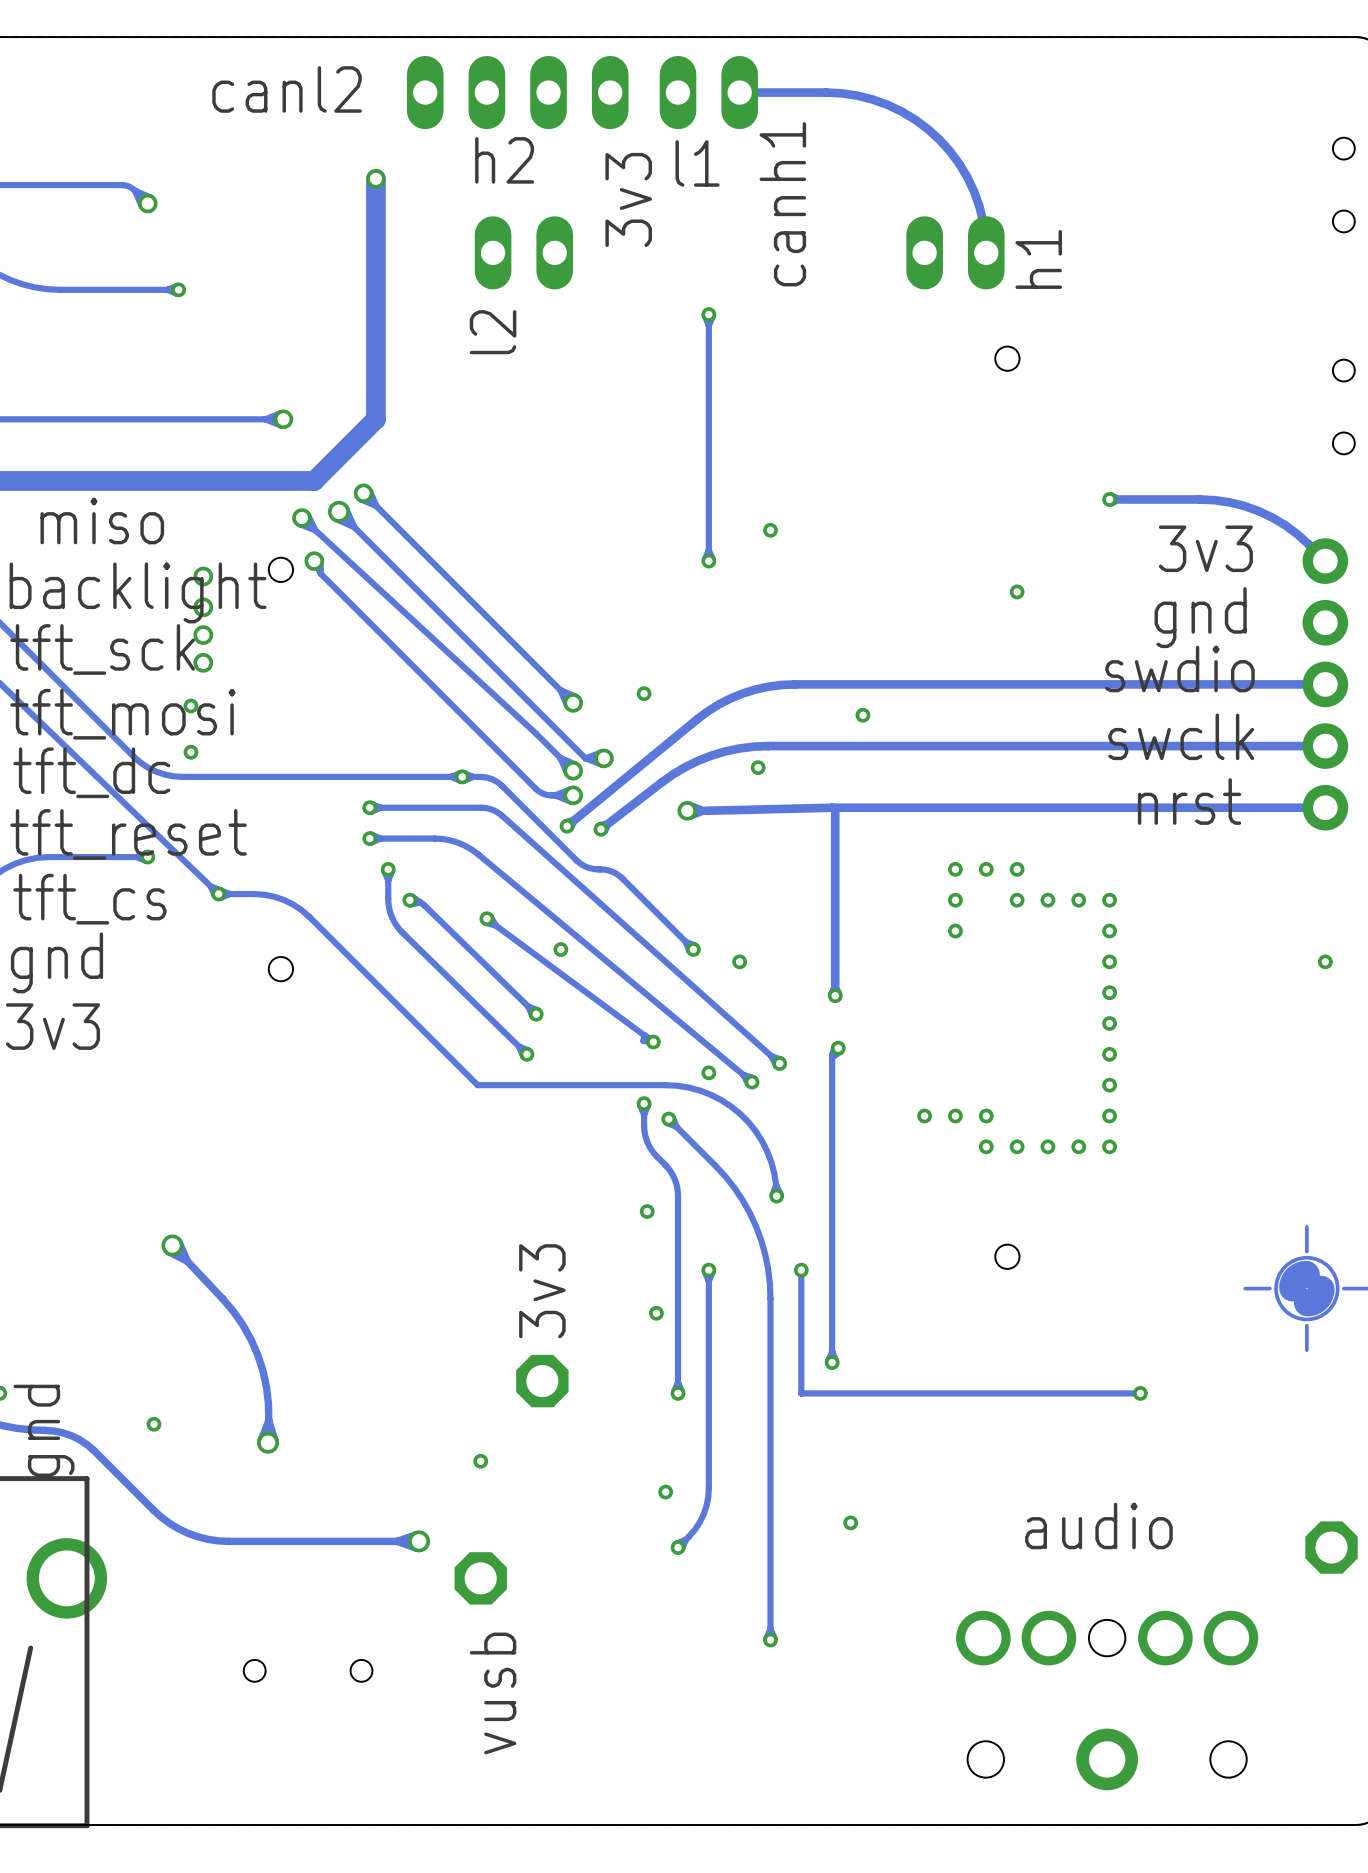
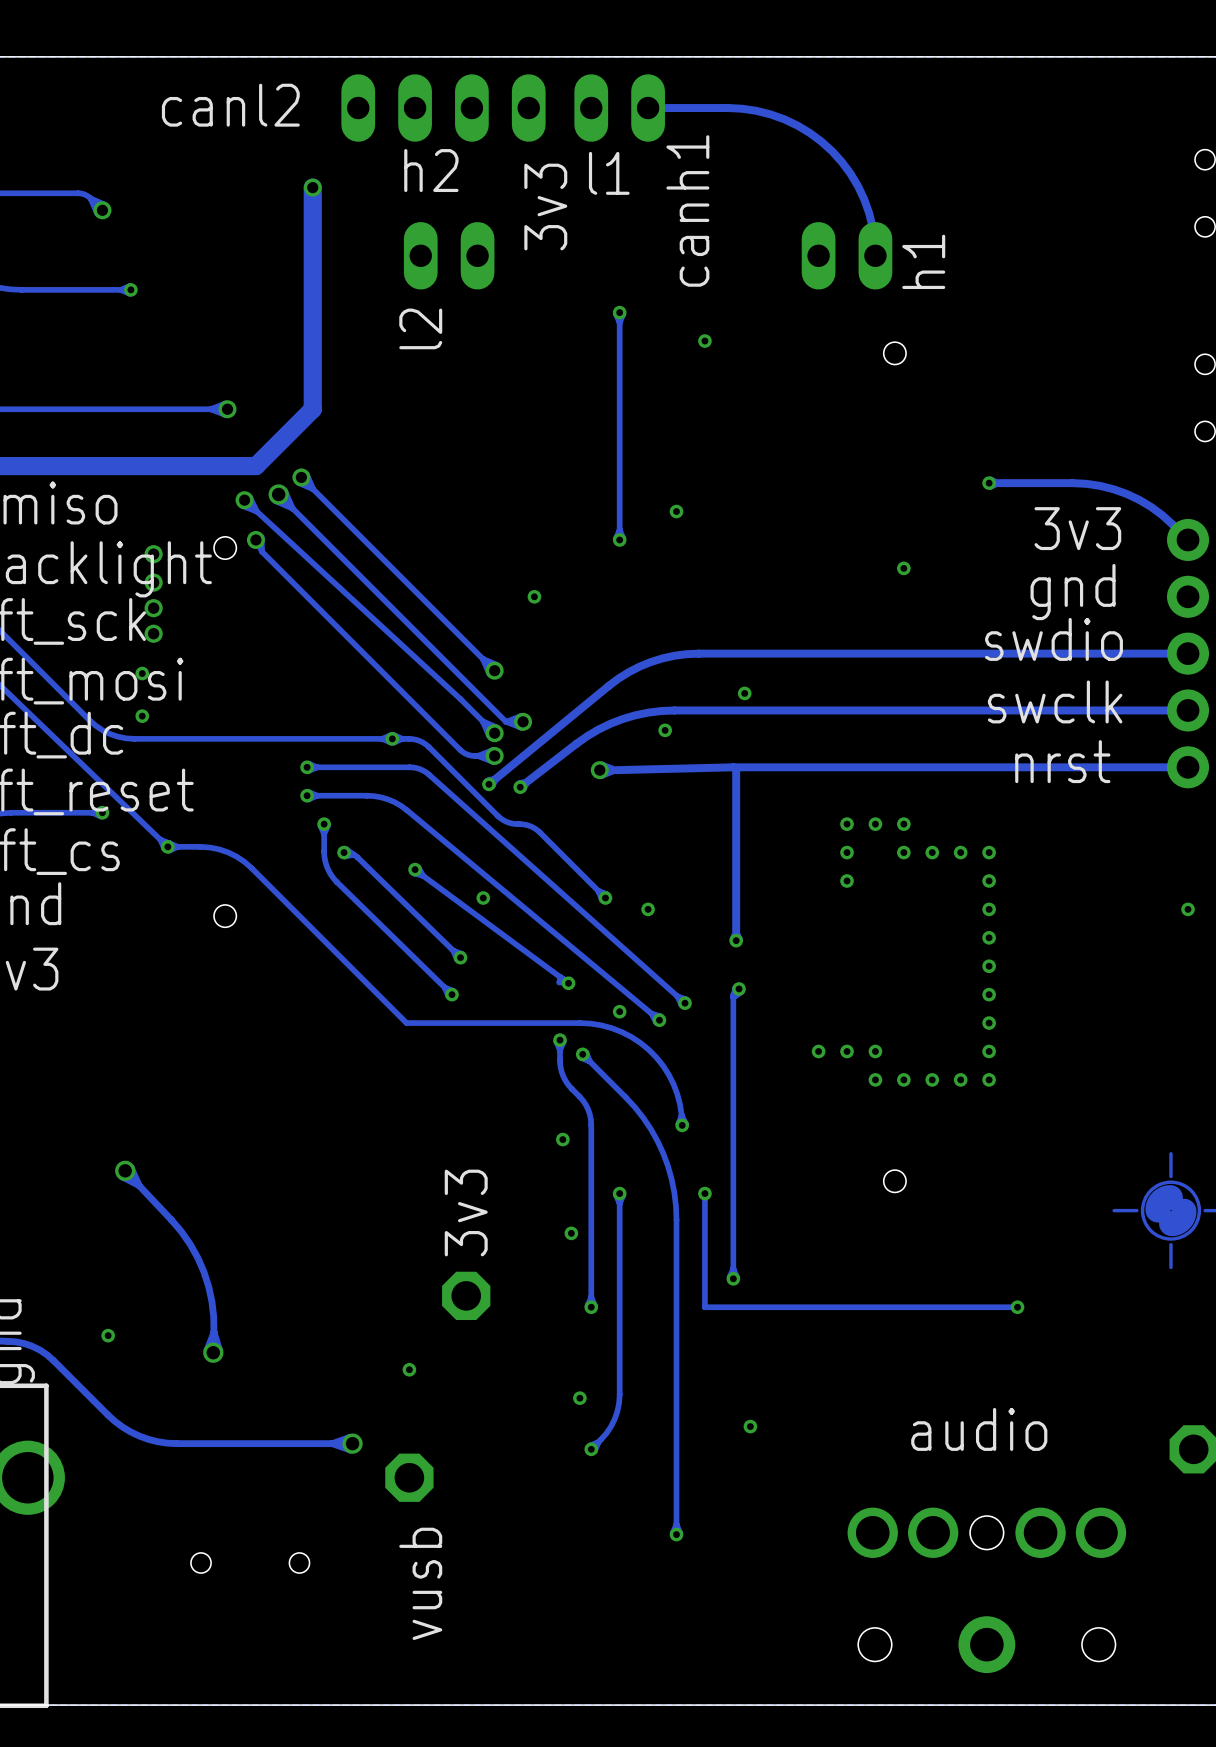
via: none -> (704, 341)
via position: (644, 693) -> (534, 596)
via position: (862, 715) -> (744, 693)

